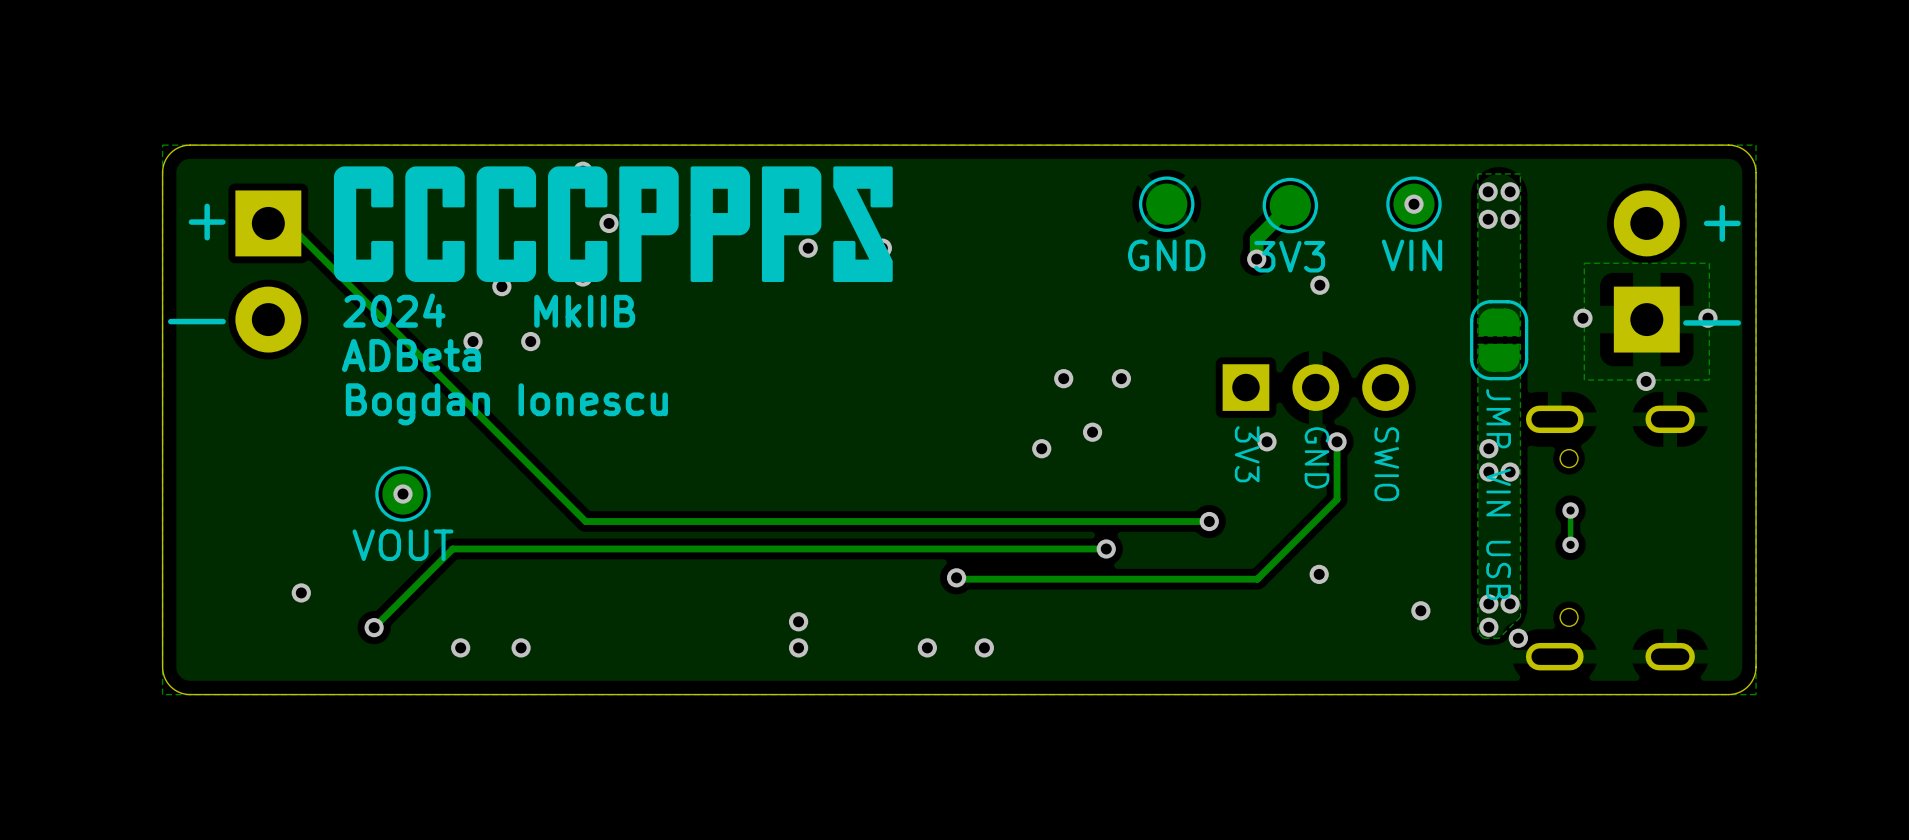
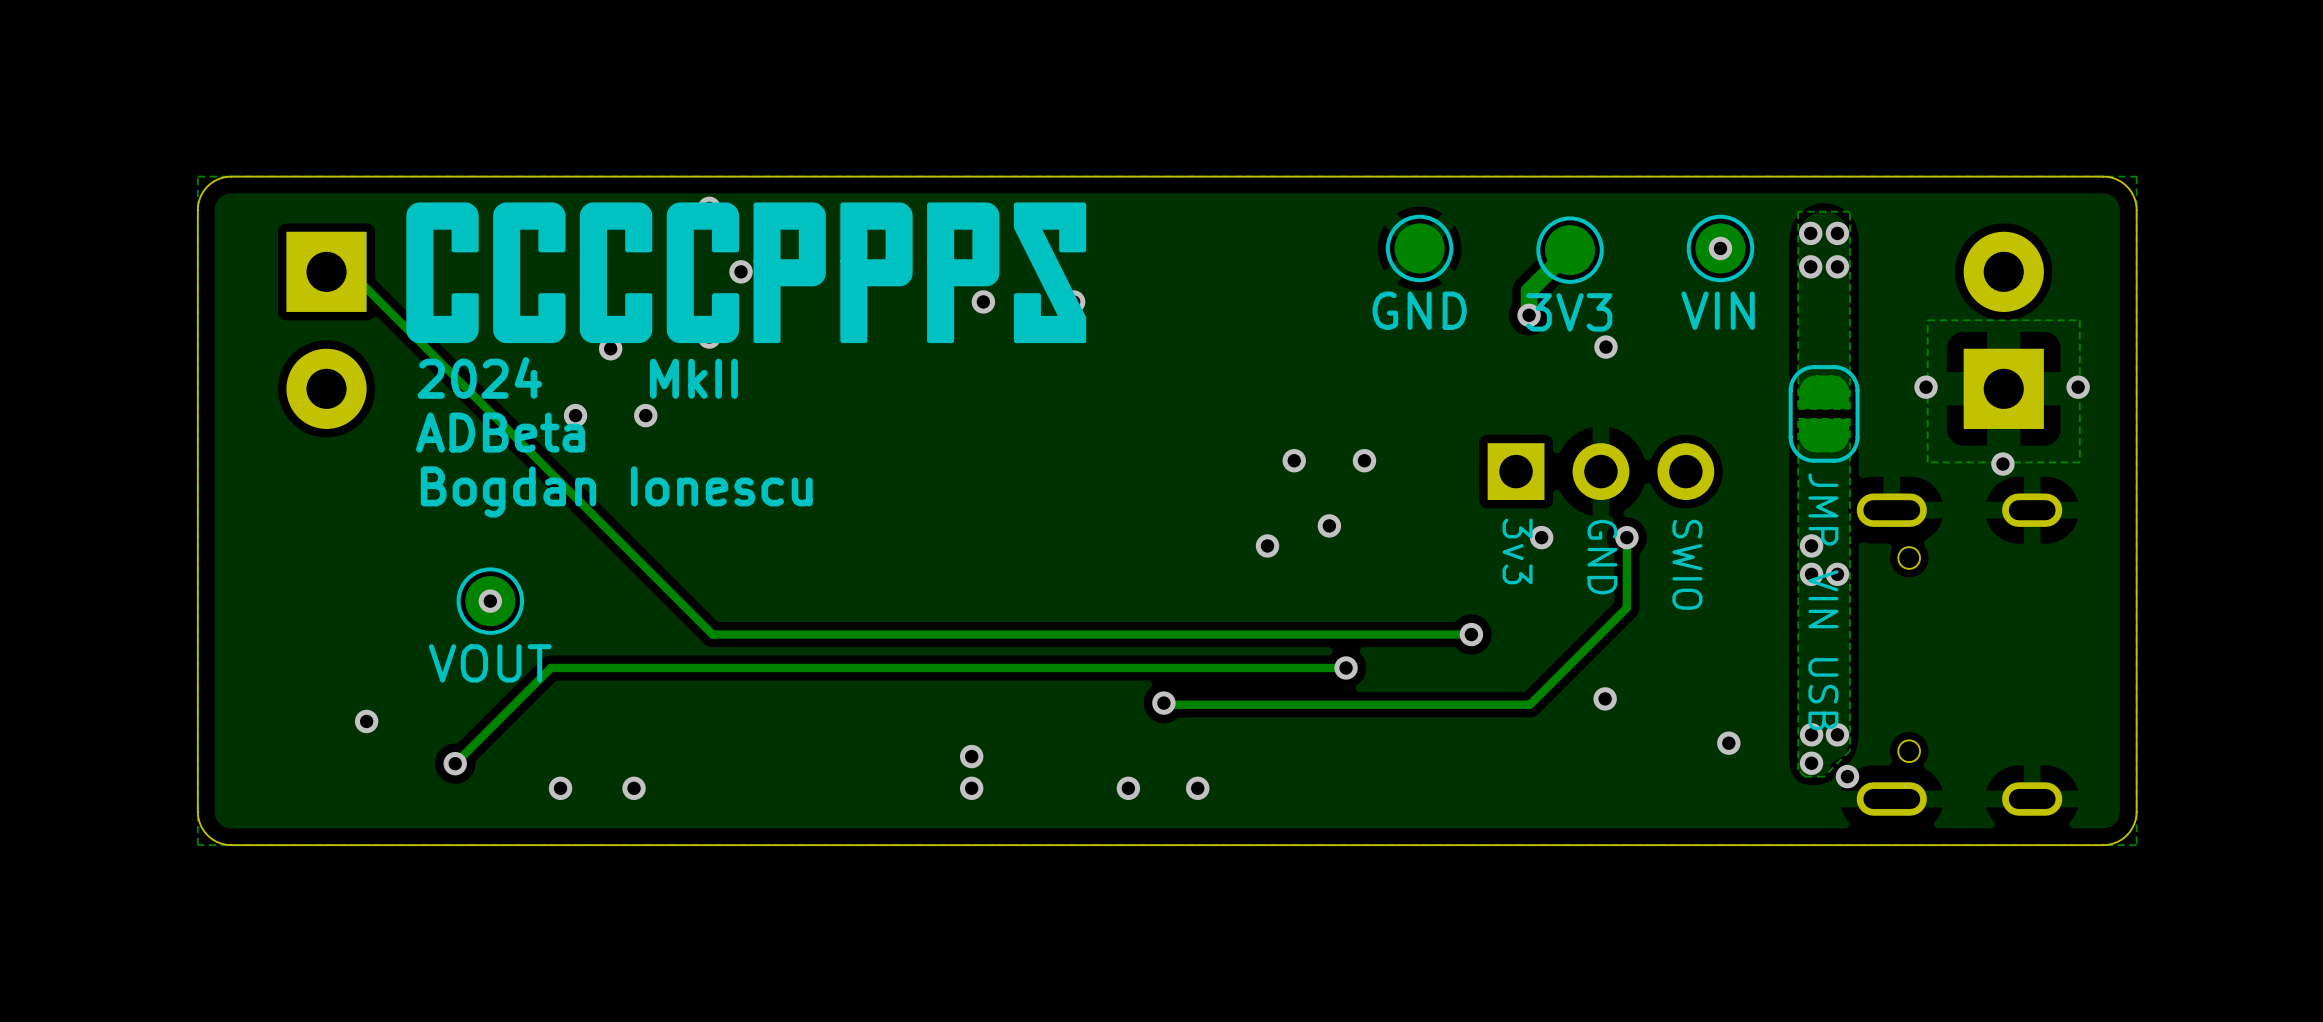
text: + (207, 222) -> none
text: + (1722, 223) -> none
text: 2024 MkIIB (489, 310) -> 2024 MkII (577, 377)
text: - (196, 321) -> none
text: - (1712, 322) -> none
text: 3V3 (1247, 454) -> 3v3 (1517, 551)
track: (1570, 510) (1570, 544) -> none
via: (1570, 510) -> none
via: (1570, 544) -> none

